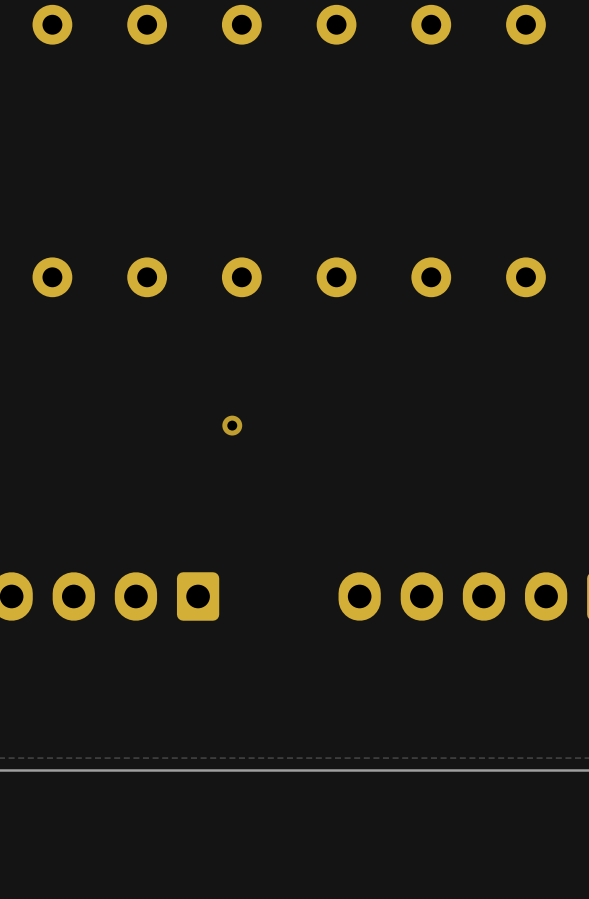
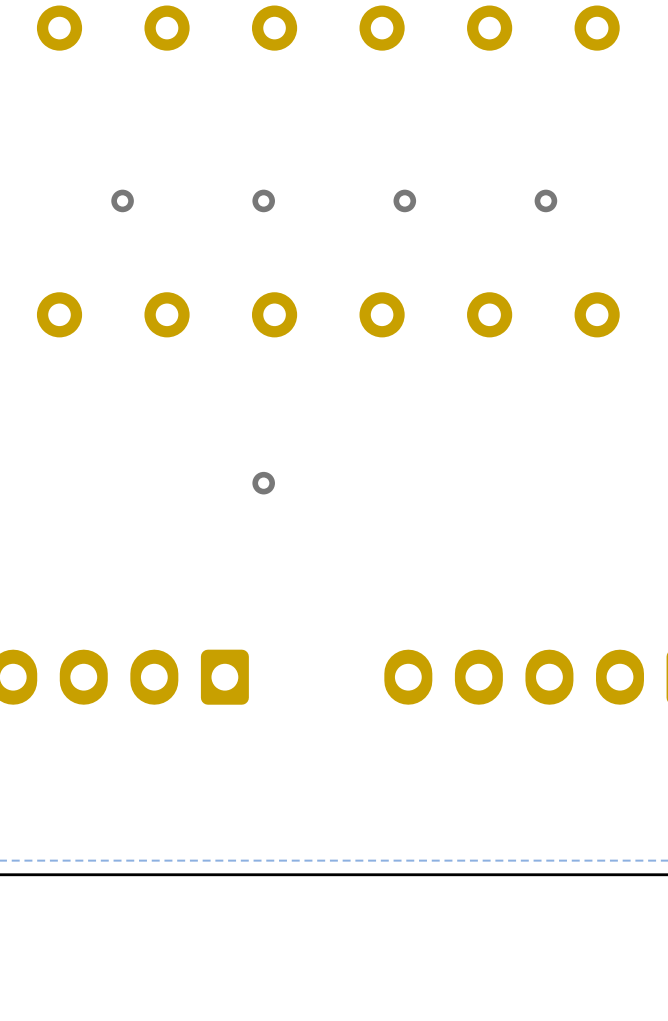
via: none -> (122, 200)
via: none -> (263, 200)
via: none -> (404, 200)
via: none -> (545, 200)

